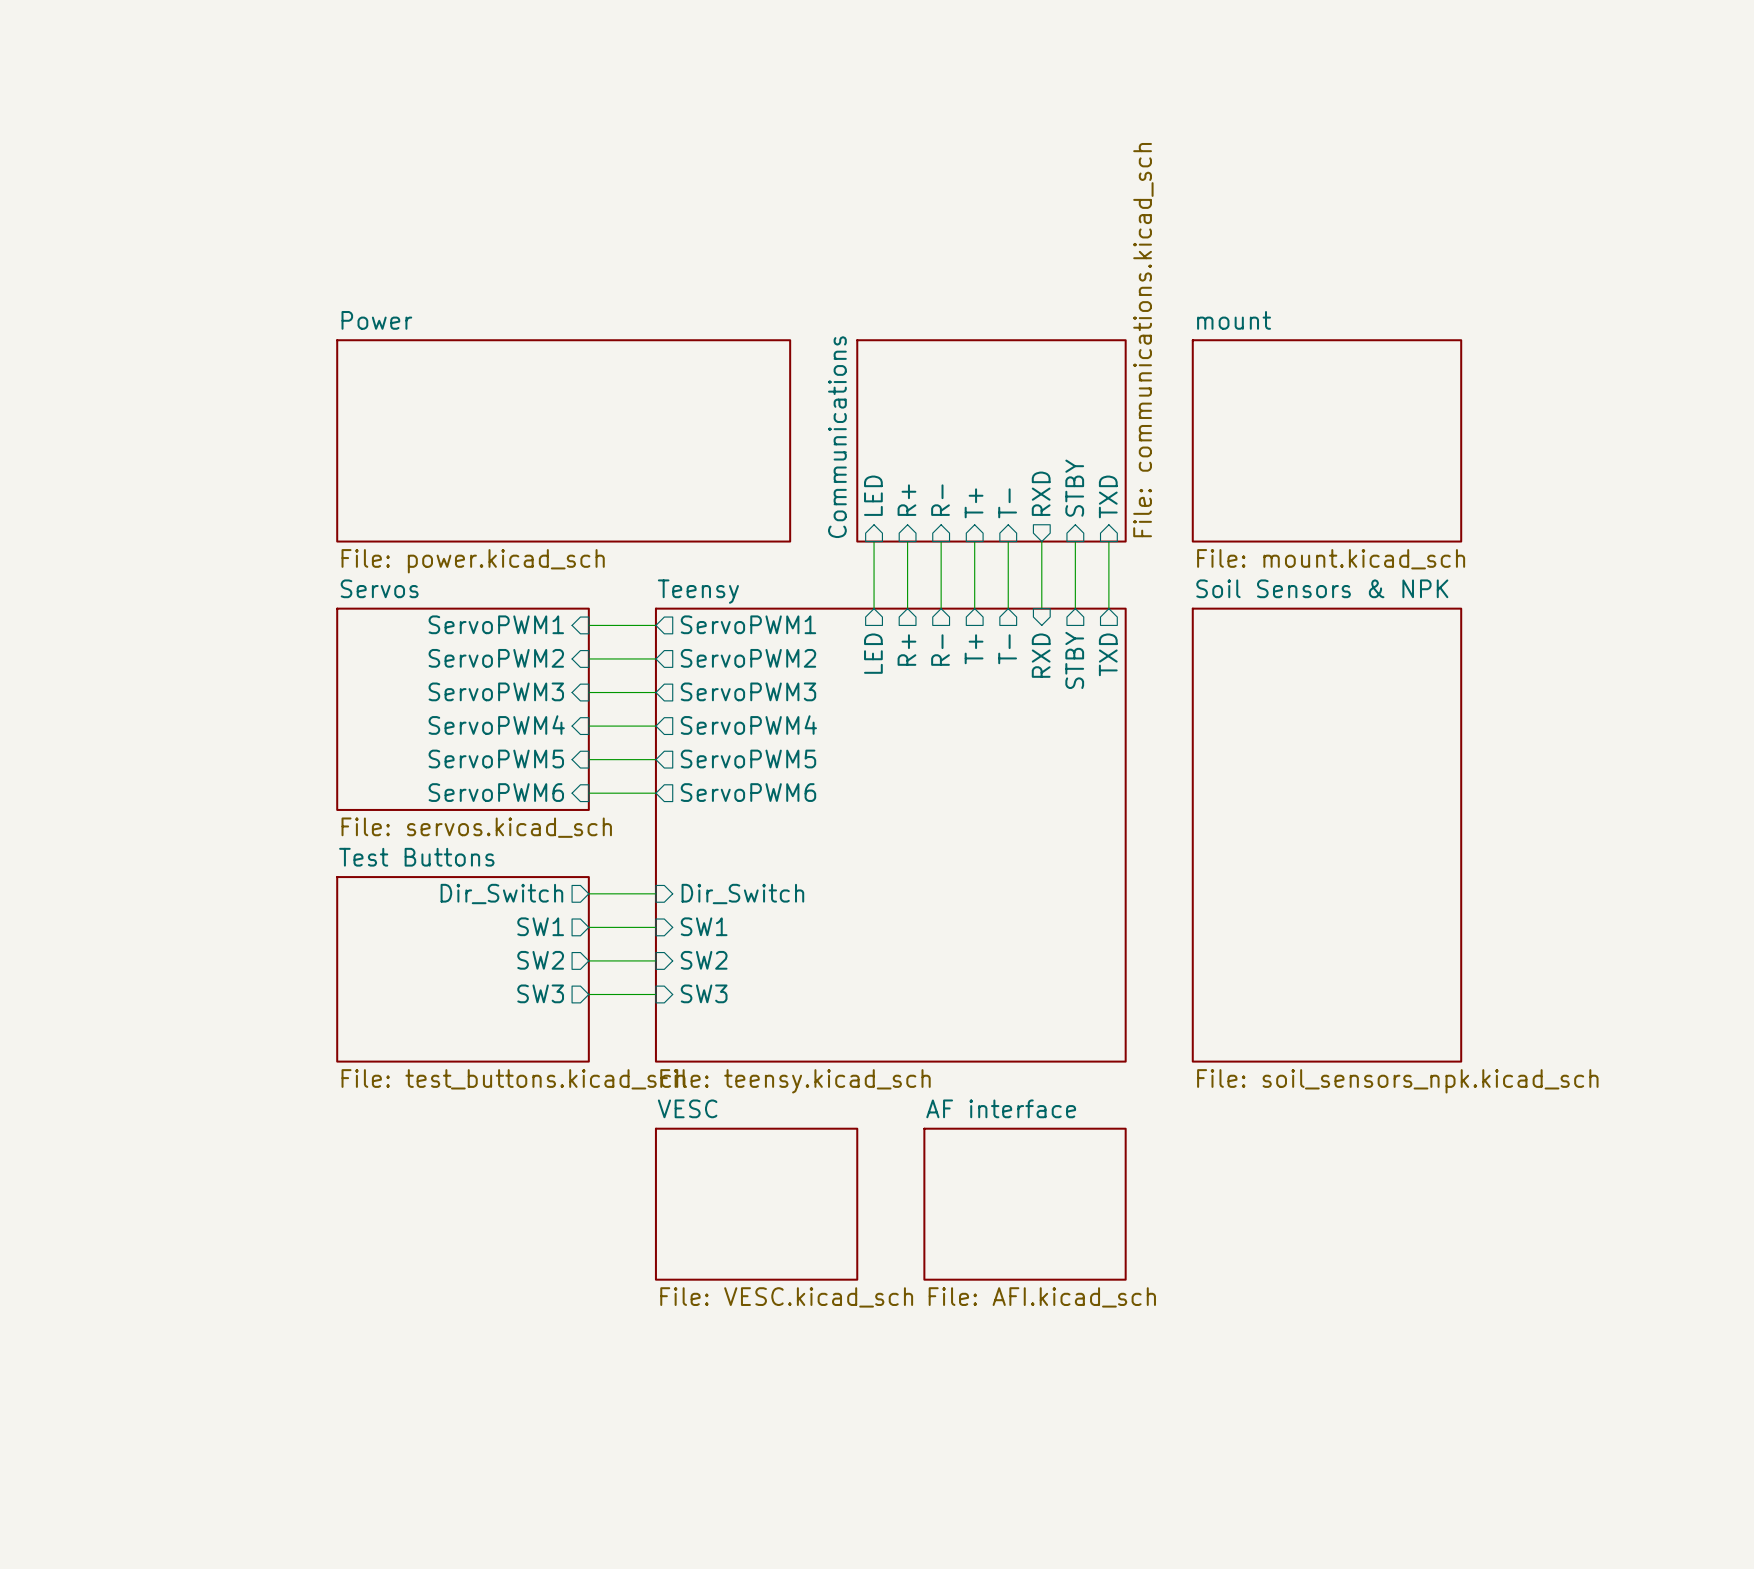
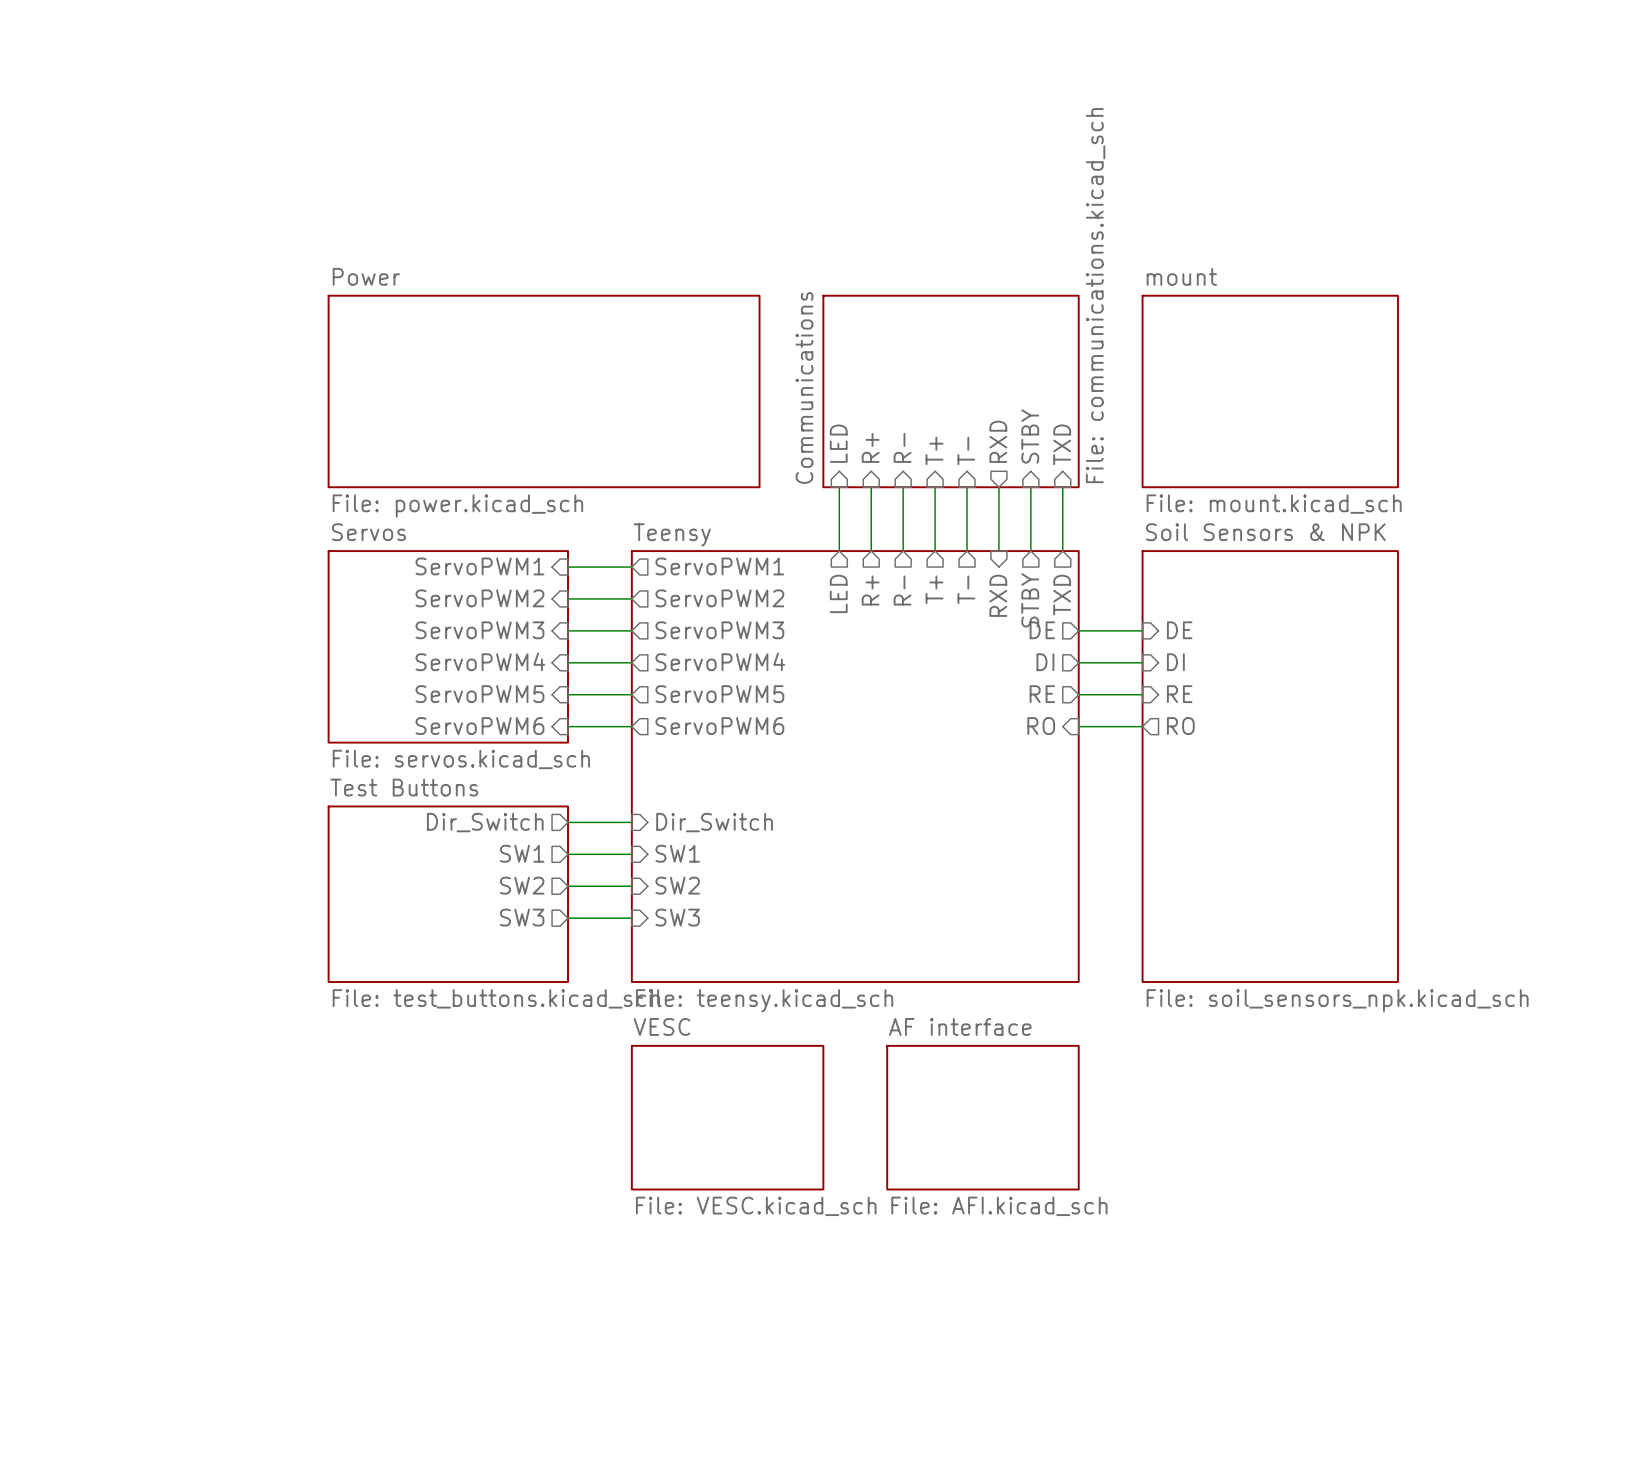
sheet pin: none -> DE (1042, 630)
sheet pin: none -> DE (1179, 630)
wire: none -> (1078, 630) (1142, 630)
sheet pin: none -> DI (1045, 662)
sheet pin: none -> DI (1175, 662)
wire: none -> (1078, 662) (1142, 662)
sheet pin: none -> RE (1042, 694)
wire: none -> (1078, 694) (1142, 694)
sheet pin: none -> RE (1179, 694)
sheet pin: none -> RO (1041, 726)
sheet pin: none -> RO (1180, 726)
wire: none -> (1078, 726) (1142, 726)

